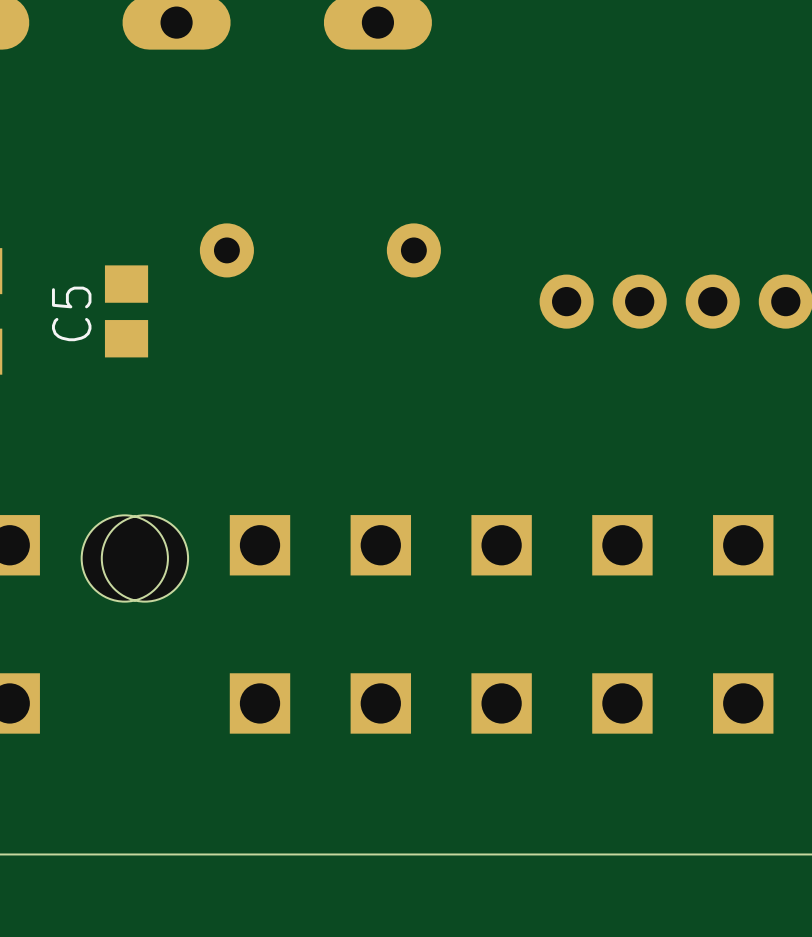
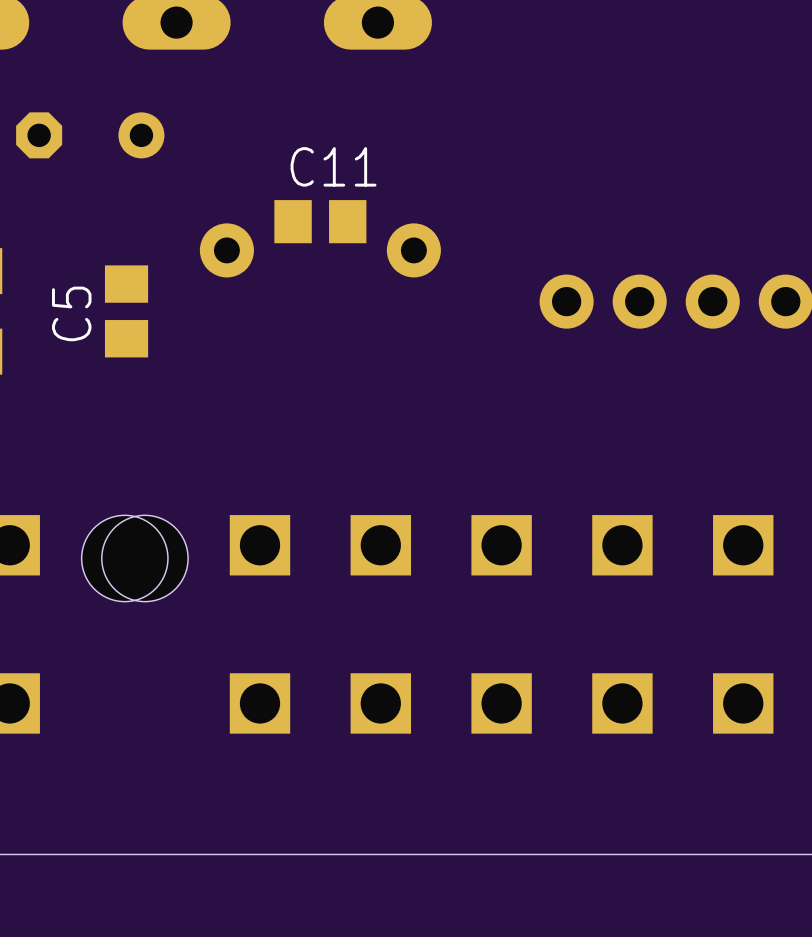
part: none -> (90, 135)
C11: none -> (320, 221)

